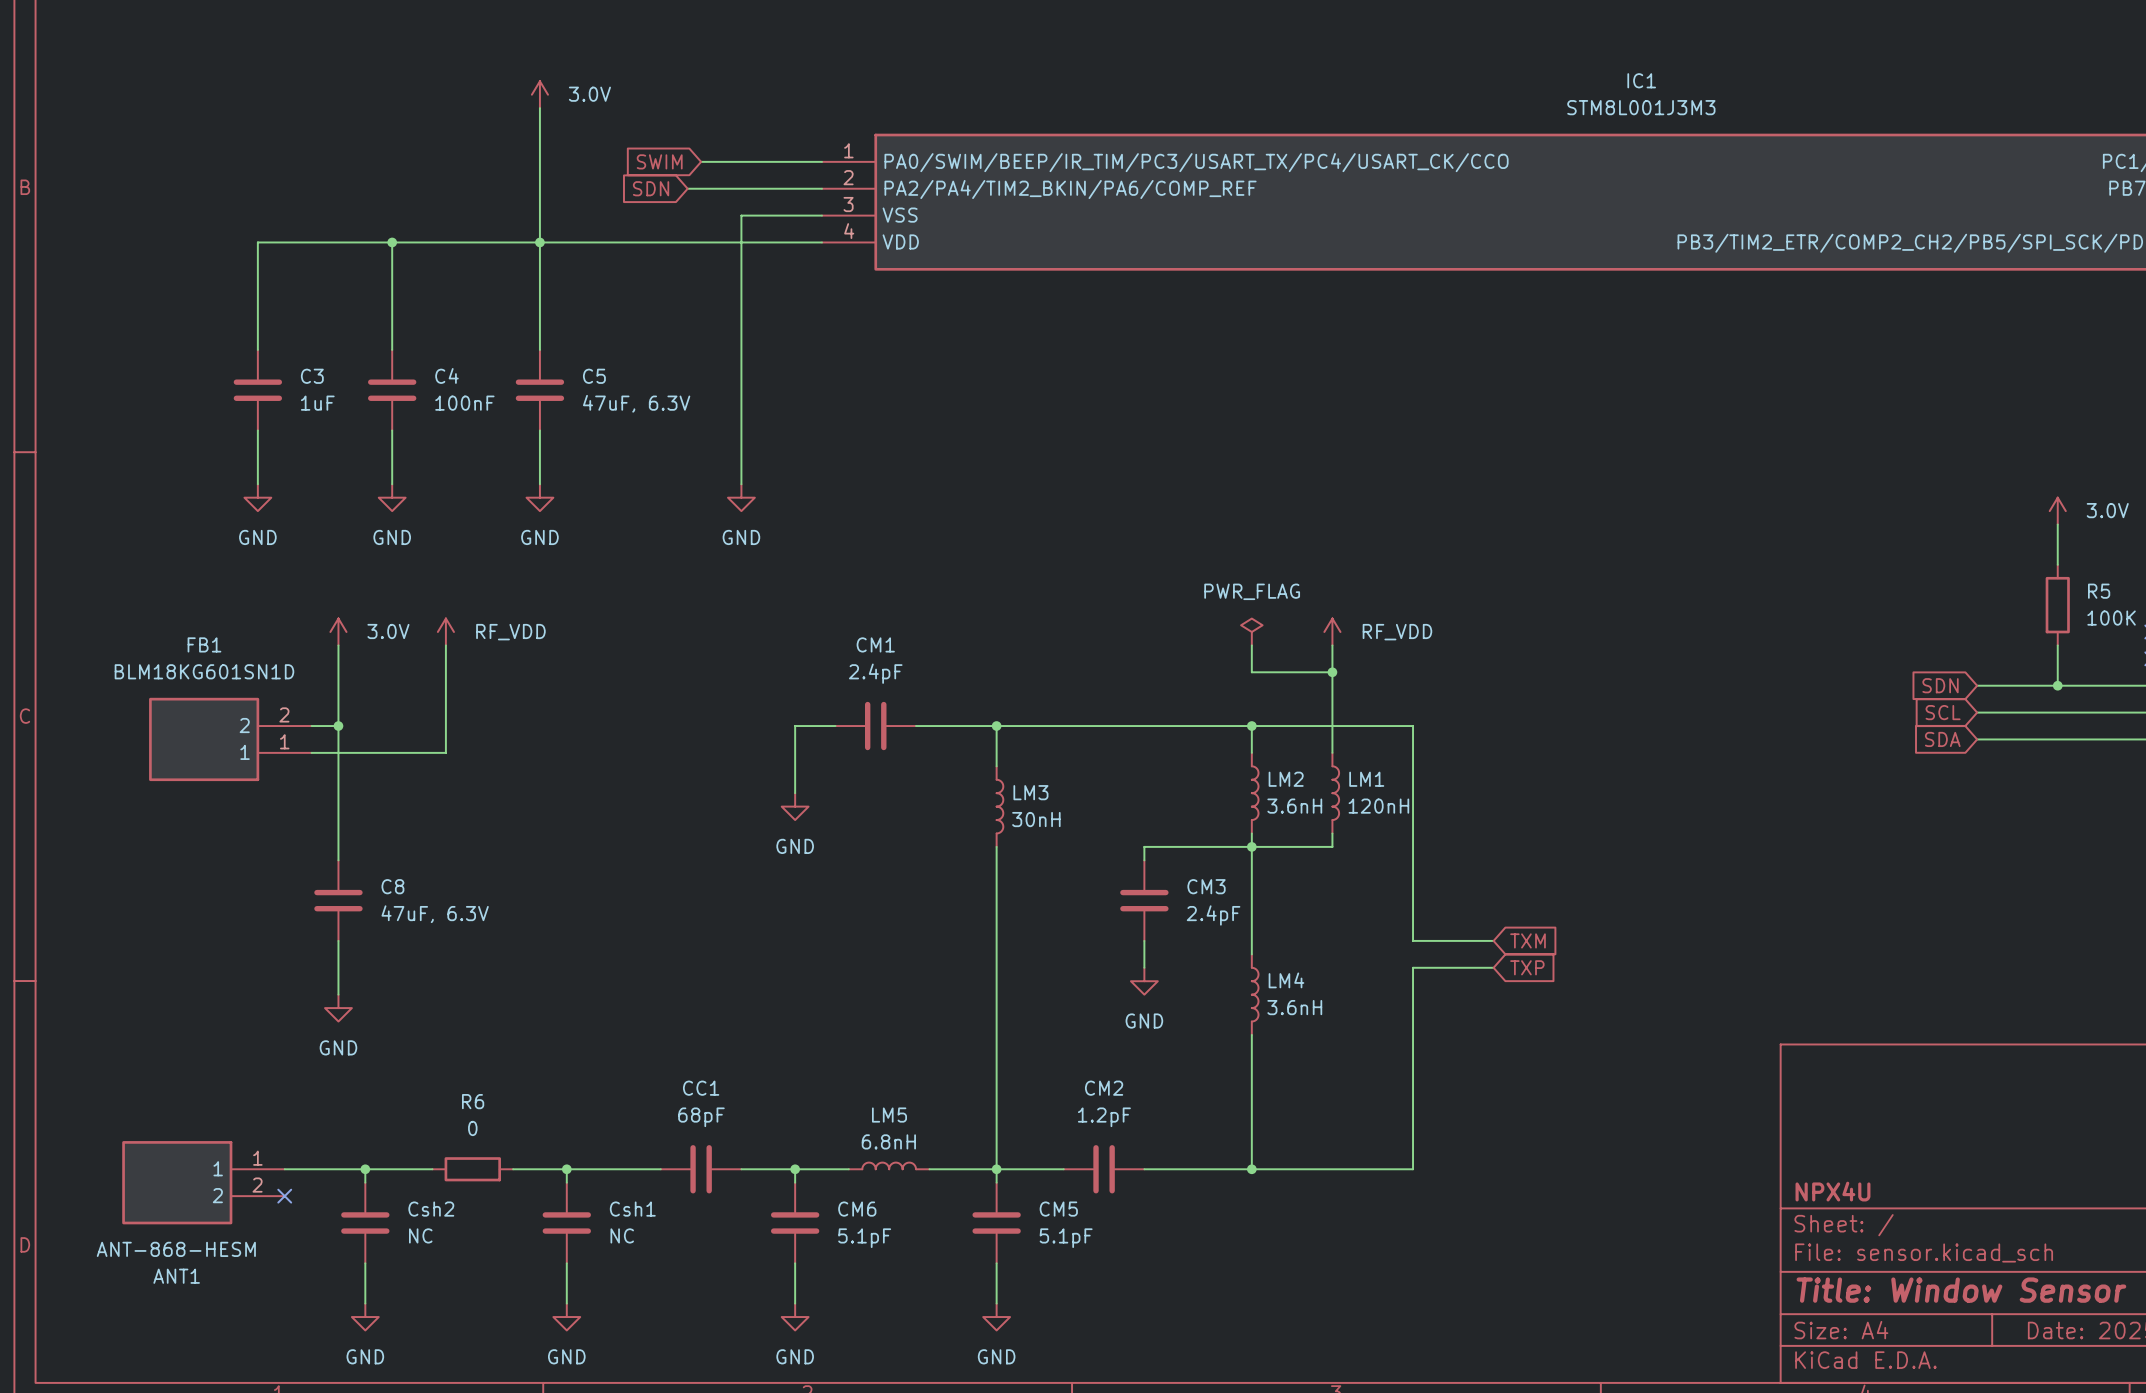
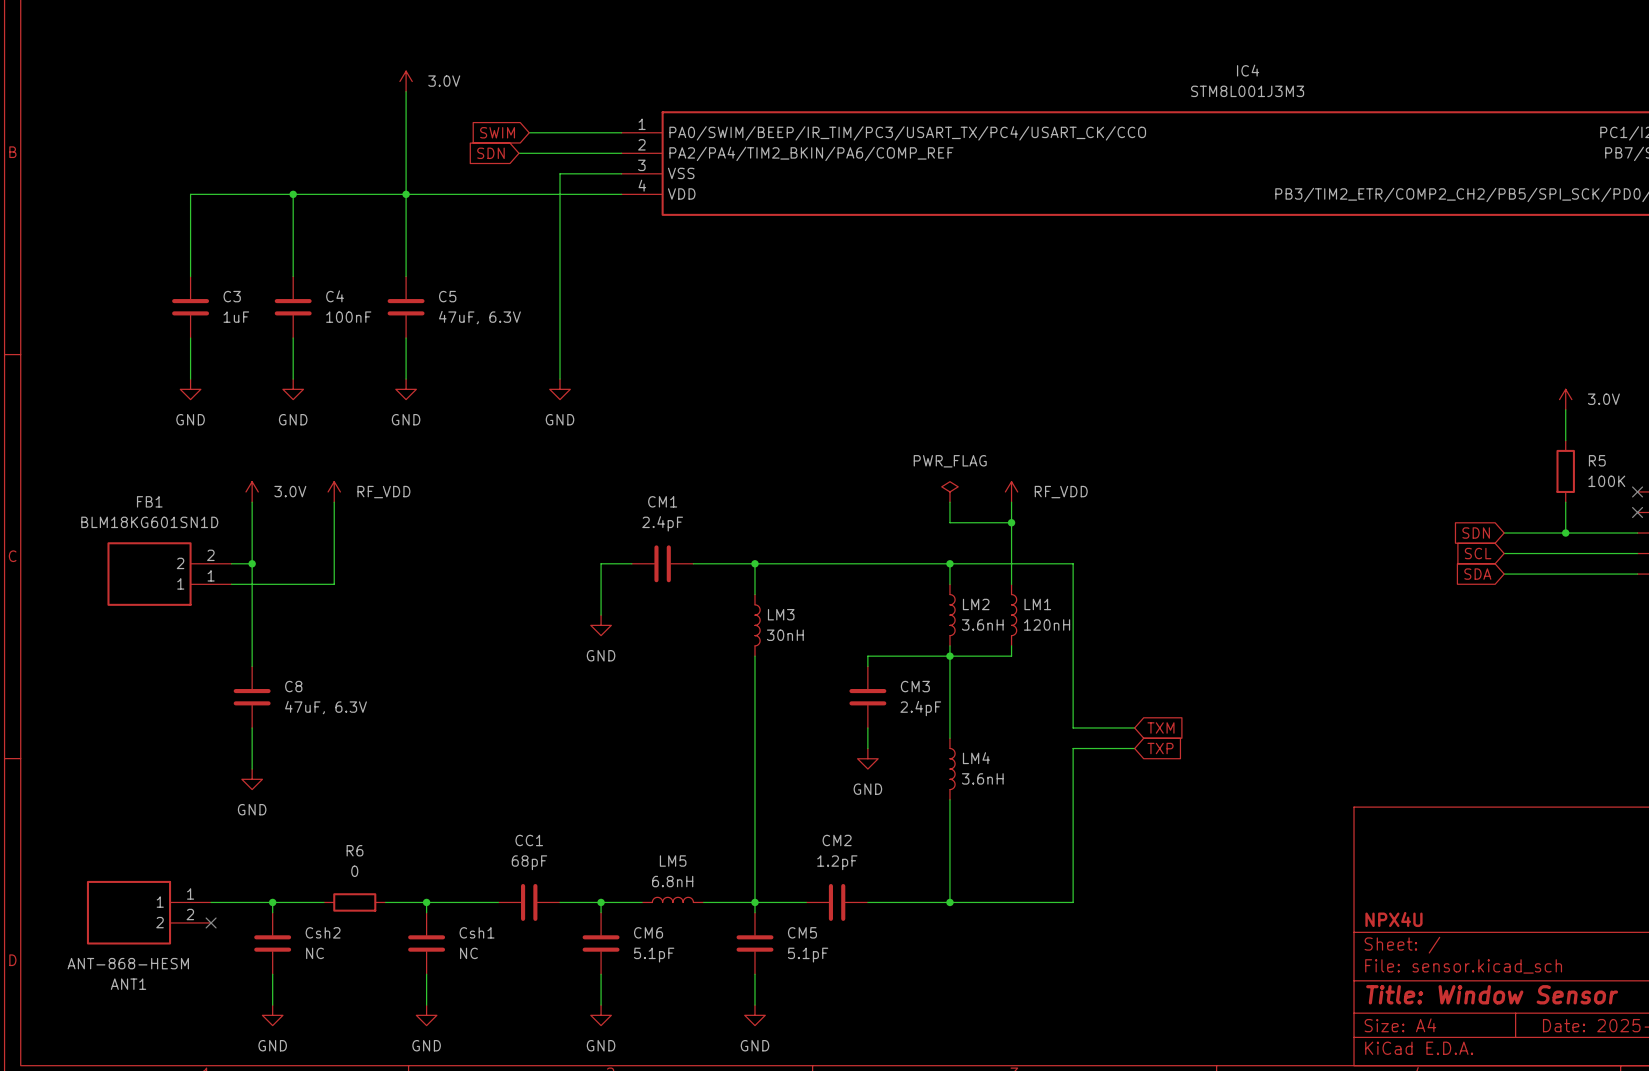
IC1 name: IC1 (1641, 80) -> IC4 (1248, 70)

